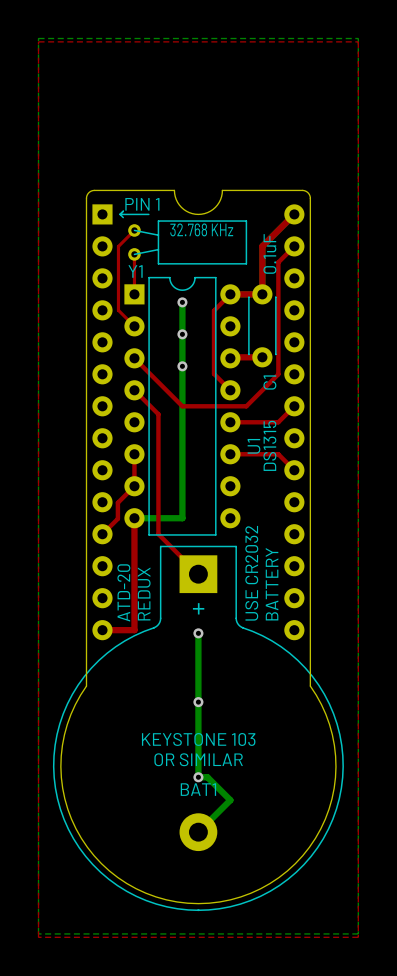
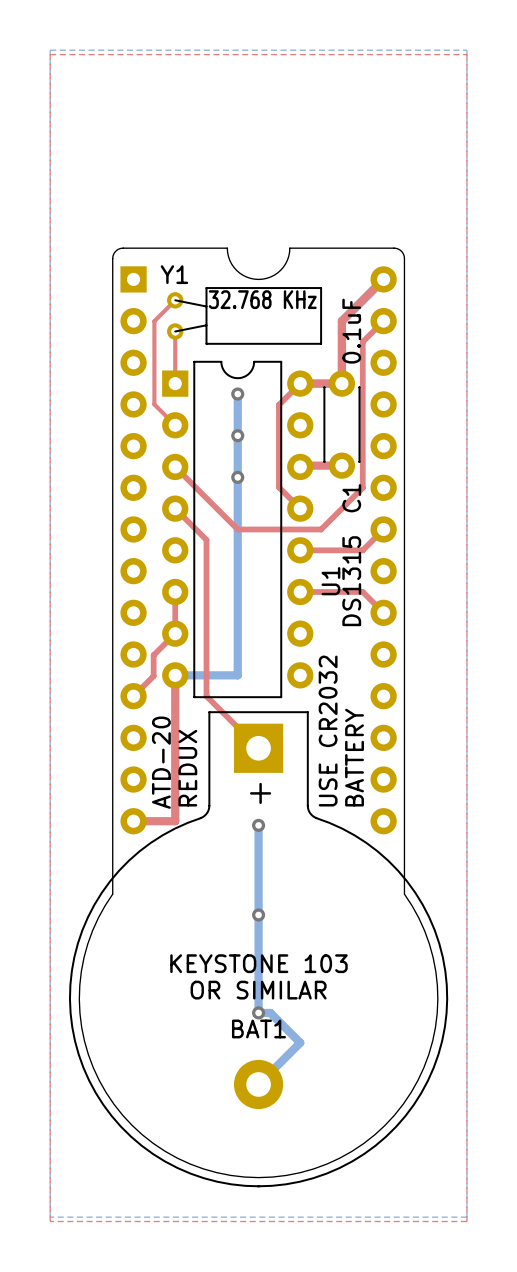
text: PIN 1 (142, 204) -> none
line: (120, 214) (123, 217) -> none
line: (120, 214) (148, 214) -> none
Y1 name position: Y1 (135, 271) -> Y1 (174, 274)

